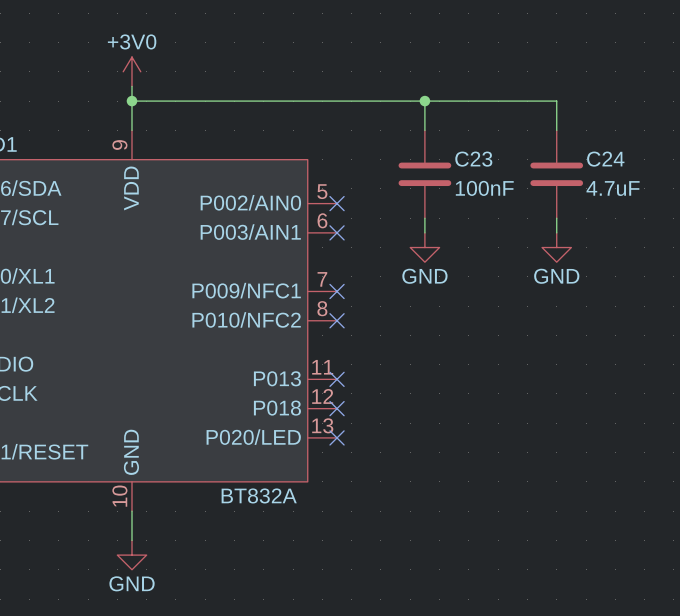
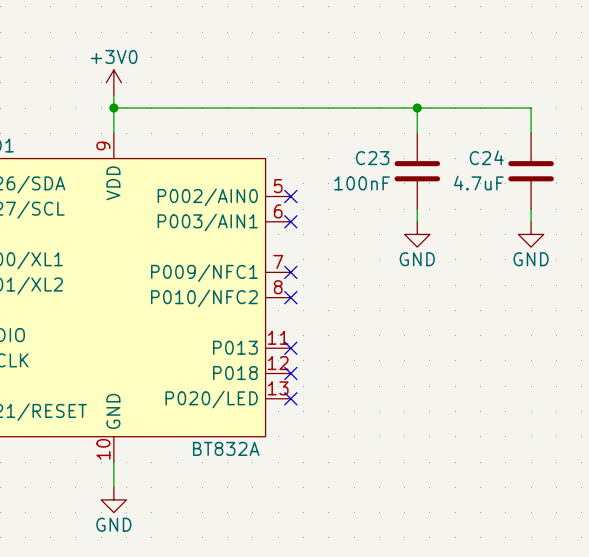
wire: (424, 101) (424, 130) -> (417, 108) (417, 133)
junction position: (424, 101) -> (417, 108)
wire: (556, 101) (556, 130) -> (480, 108) (531, 108) (531, 133)
C23 name position: C23 (473, 159) -> C23 (372, 158)
C24 name position: C24 (605, 159) -> C24 (486, 157)
C23 position: (424, 174) -> (417, 171)
C24 position: (556, 174) -> (531, 171)
C23 value position: 100nF (484, 188) -> 100nF (362, 183)
C24 value position: 4.7uF (613, 188) -> 4.7uF (478, 183)
wire: (424, 218) (424, 232) -> (417, 209) (417, 221)
wire: (556, 218) (556, 232) -> (531, 209) (531, 221)
power symbol: GND (424, 247) -> none
power symbol: none -> GND (417, 234)
power symbol: GND (556, 247) -> none
power symbol: none -> GND (531, 234)

